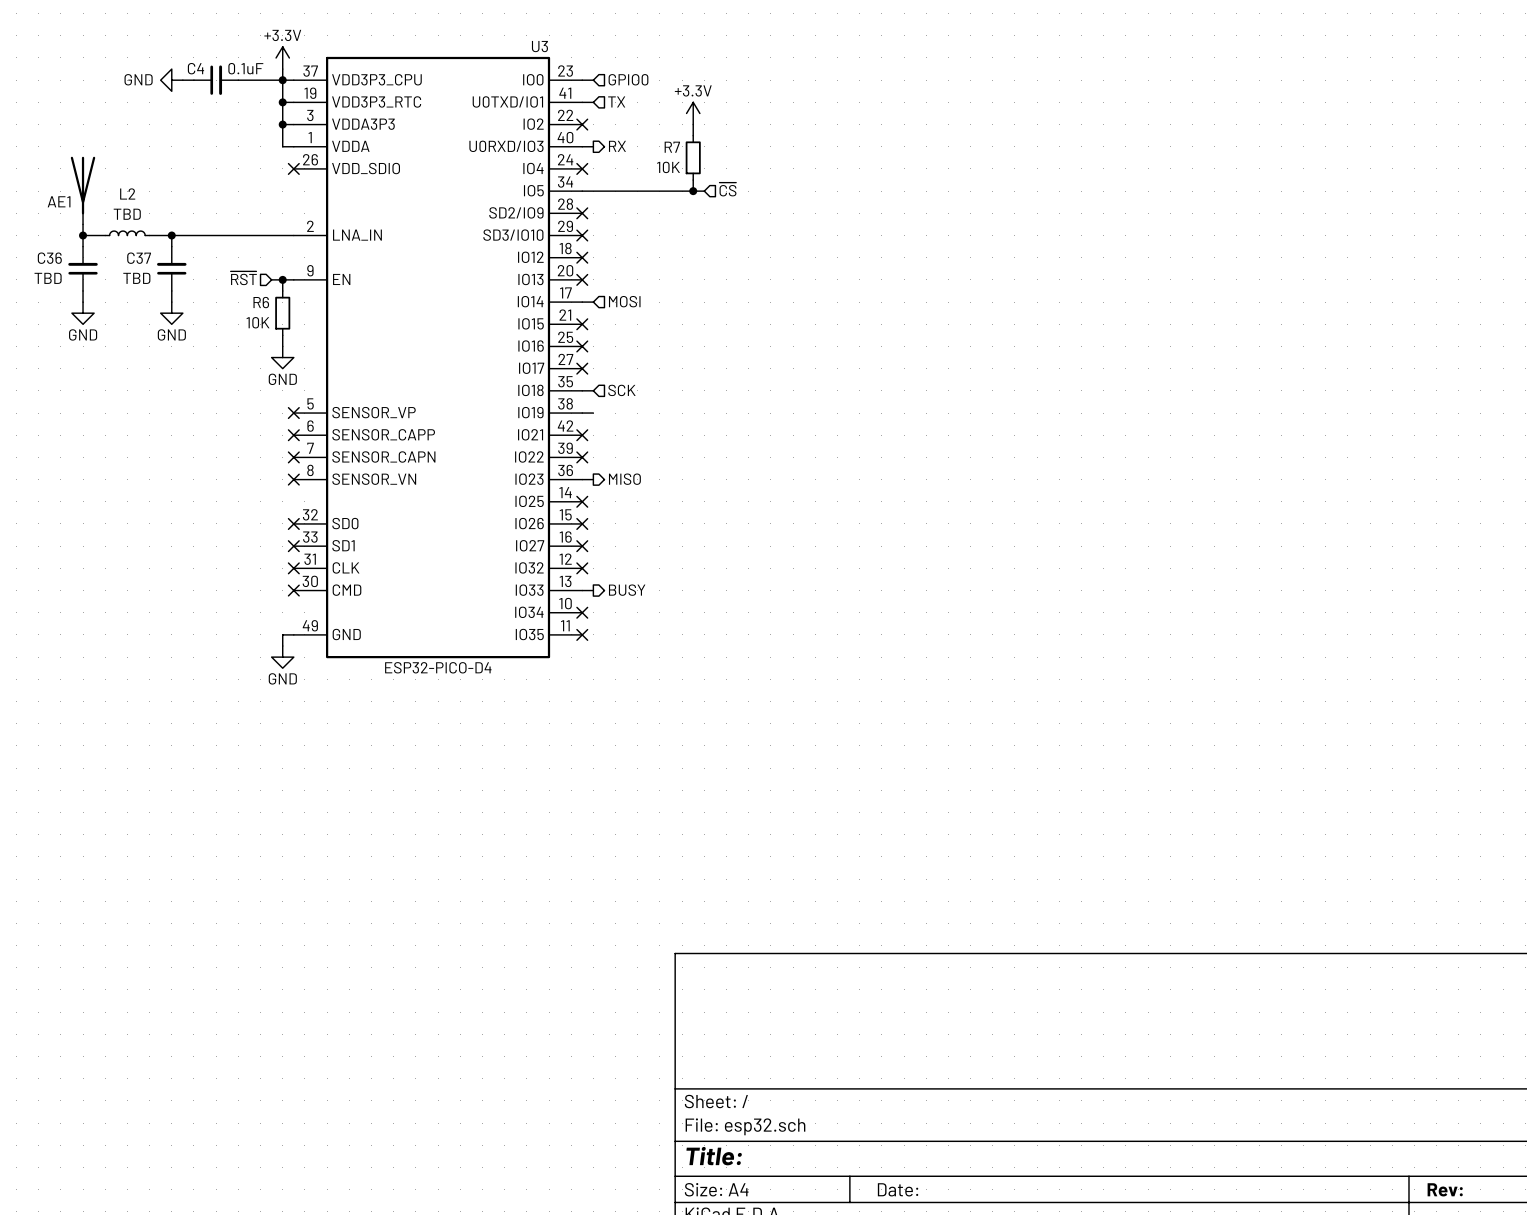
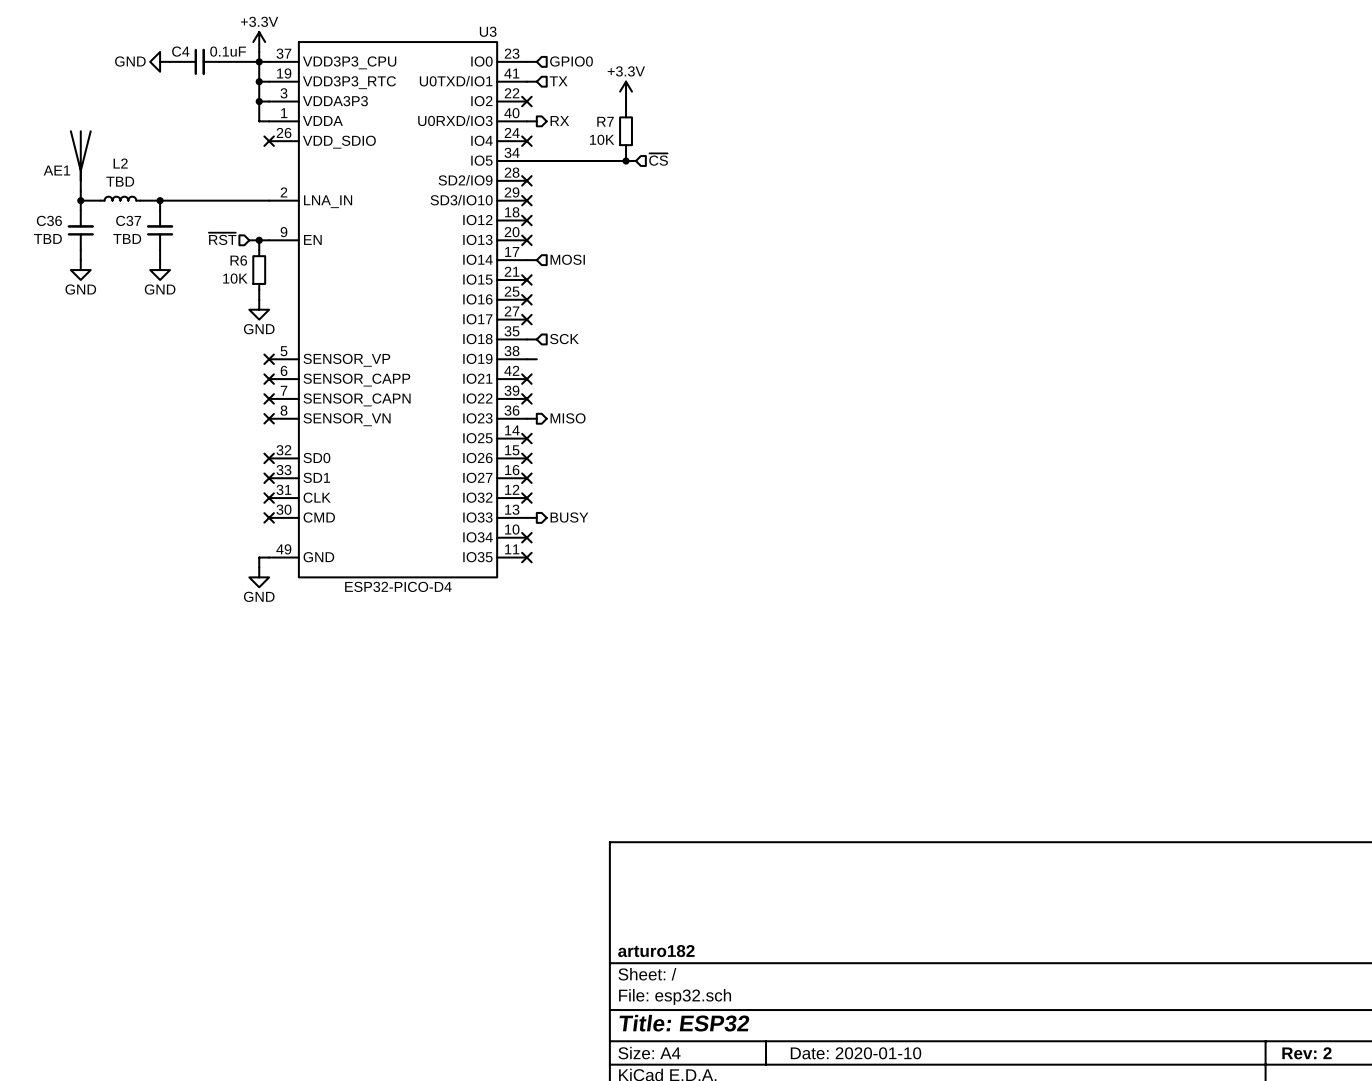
title block: none -> arturo182 (656, 951)
title block: Title: (714, 1156) -> Title: ESP32 (684, 1023)
title block: Date: (898, 1189) -> Date: 2020-01-10 (856, 1053)
title block: Rev: (1445, 1189) -> Rev: 2 (1306, 1053)

